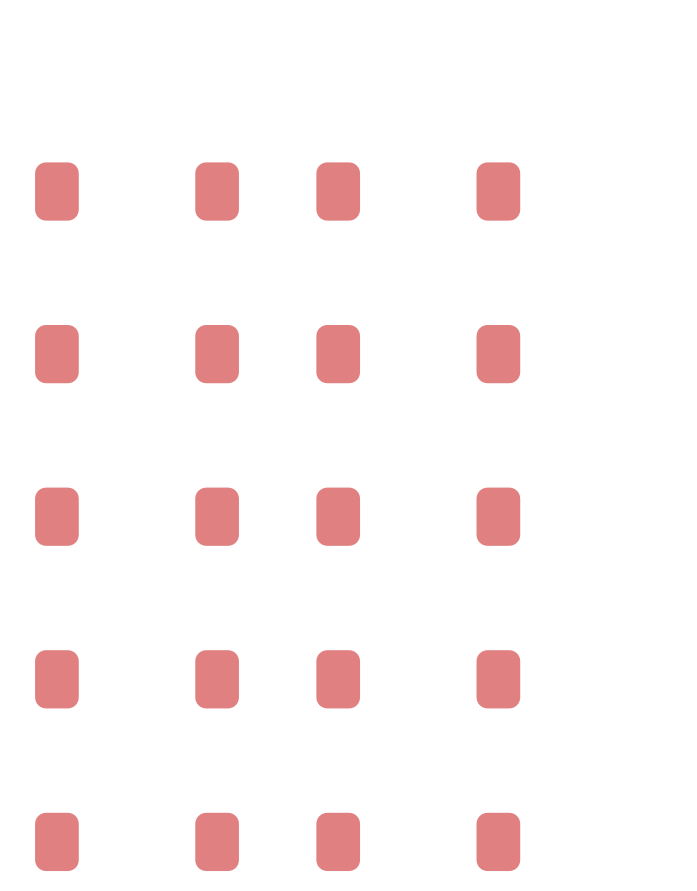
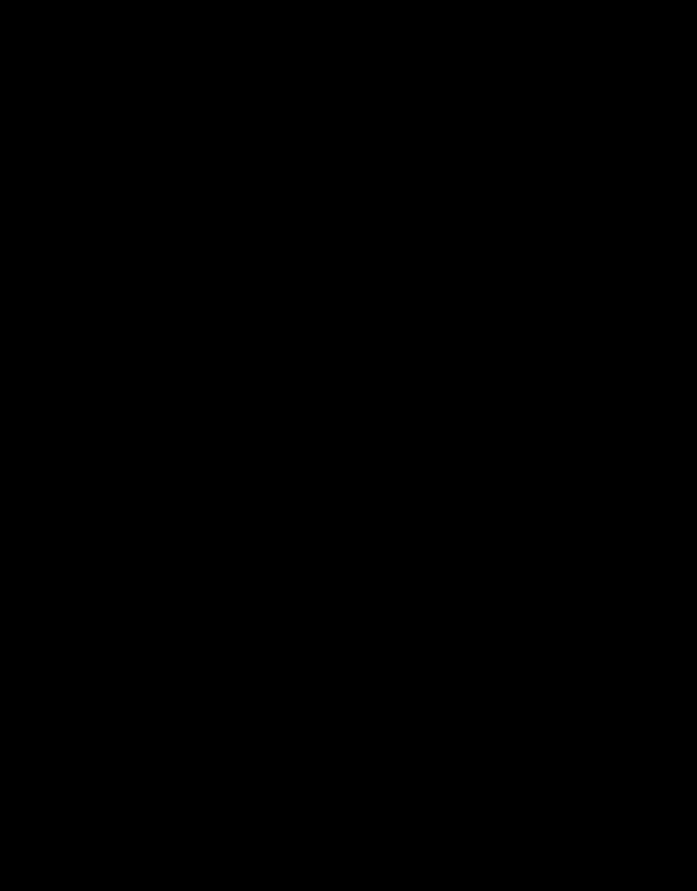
part: (137, 191) -> none
part: (418, 191) -> none
part: (137, 354) -> none
part: (418, 354) -> none
part: (137, 516) -> none
part: (418, 516) -> none
part: (137, 679) -> none
part: (418, 679) -> none
part: (137, 841) -> none
part: (418, 841) -> none

